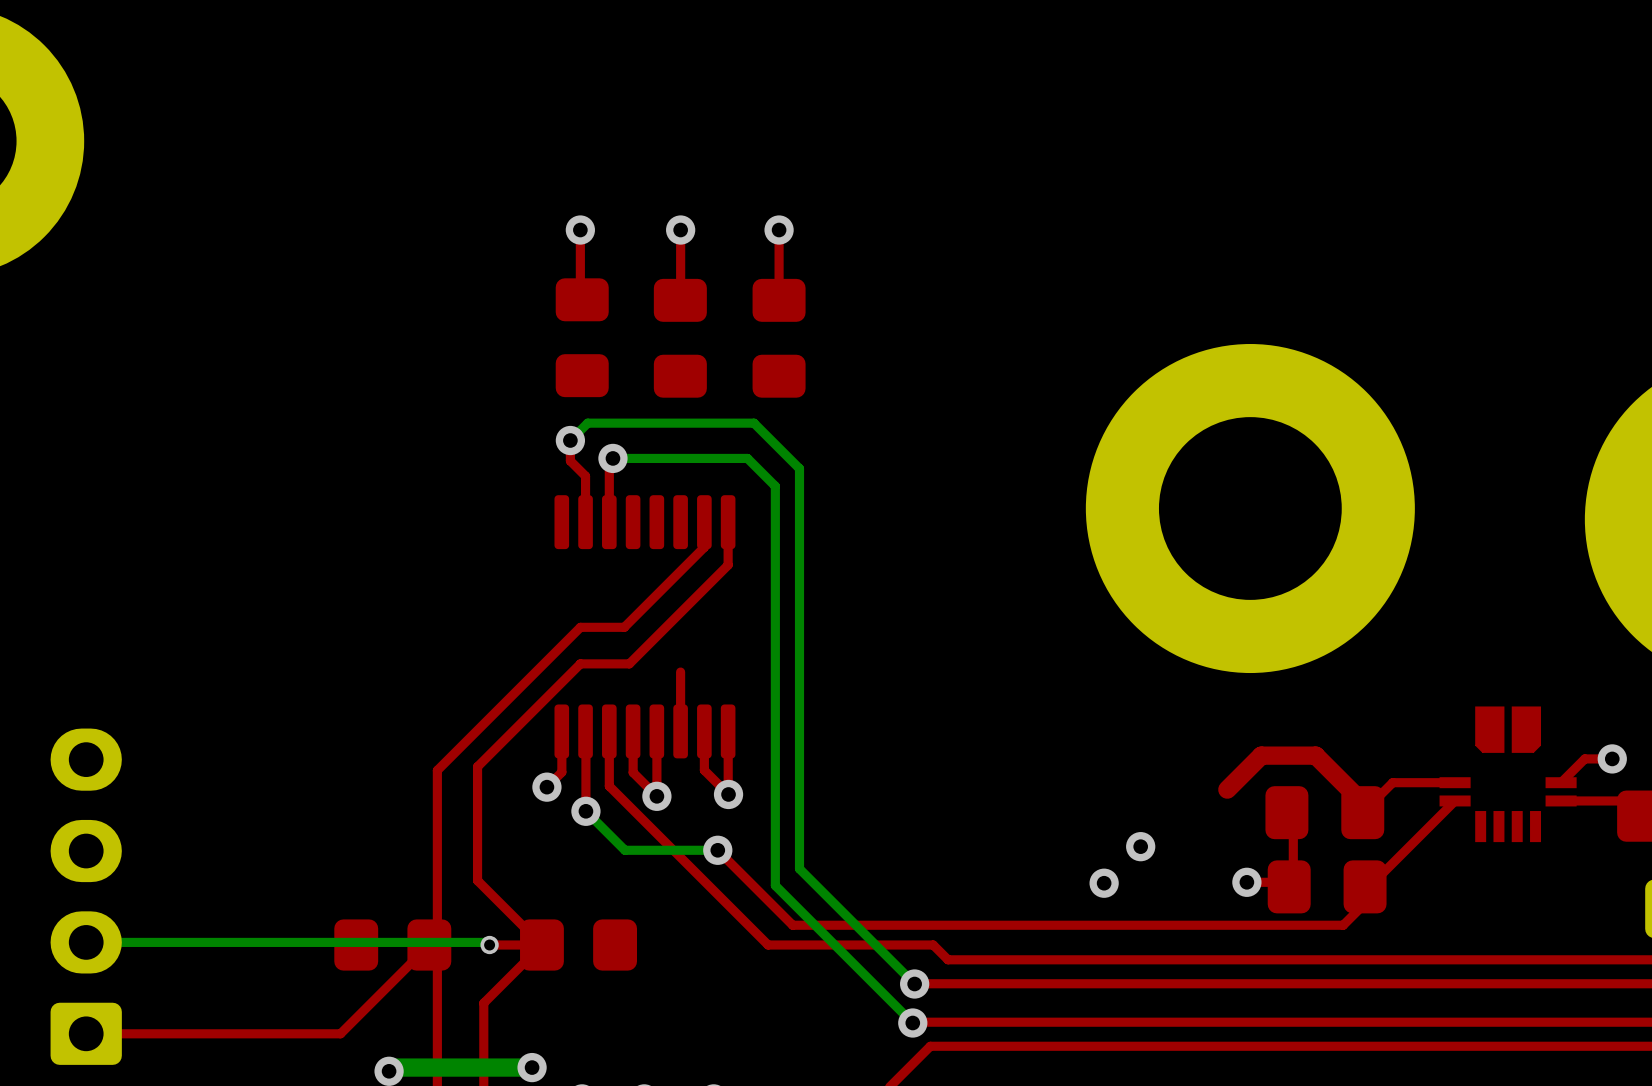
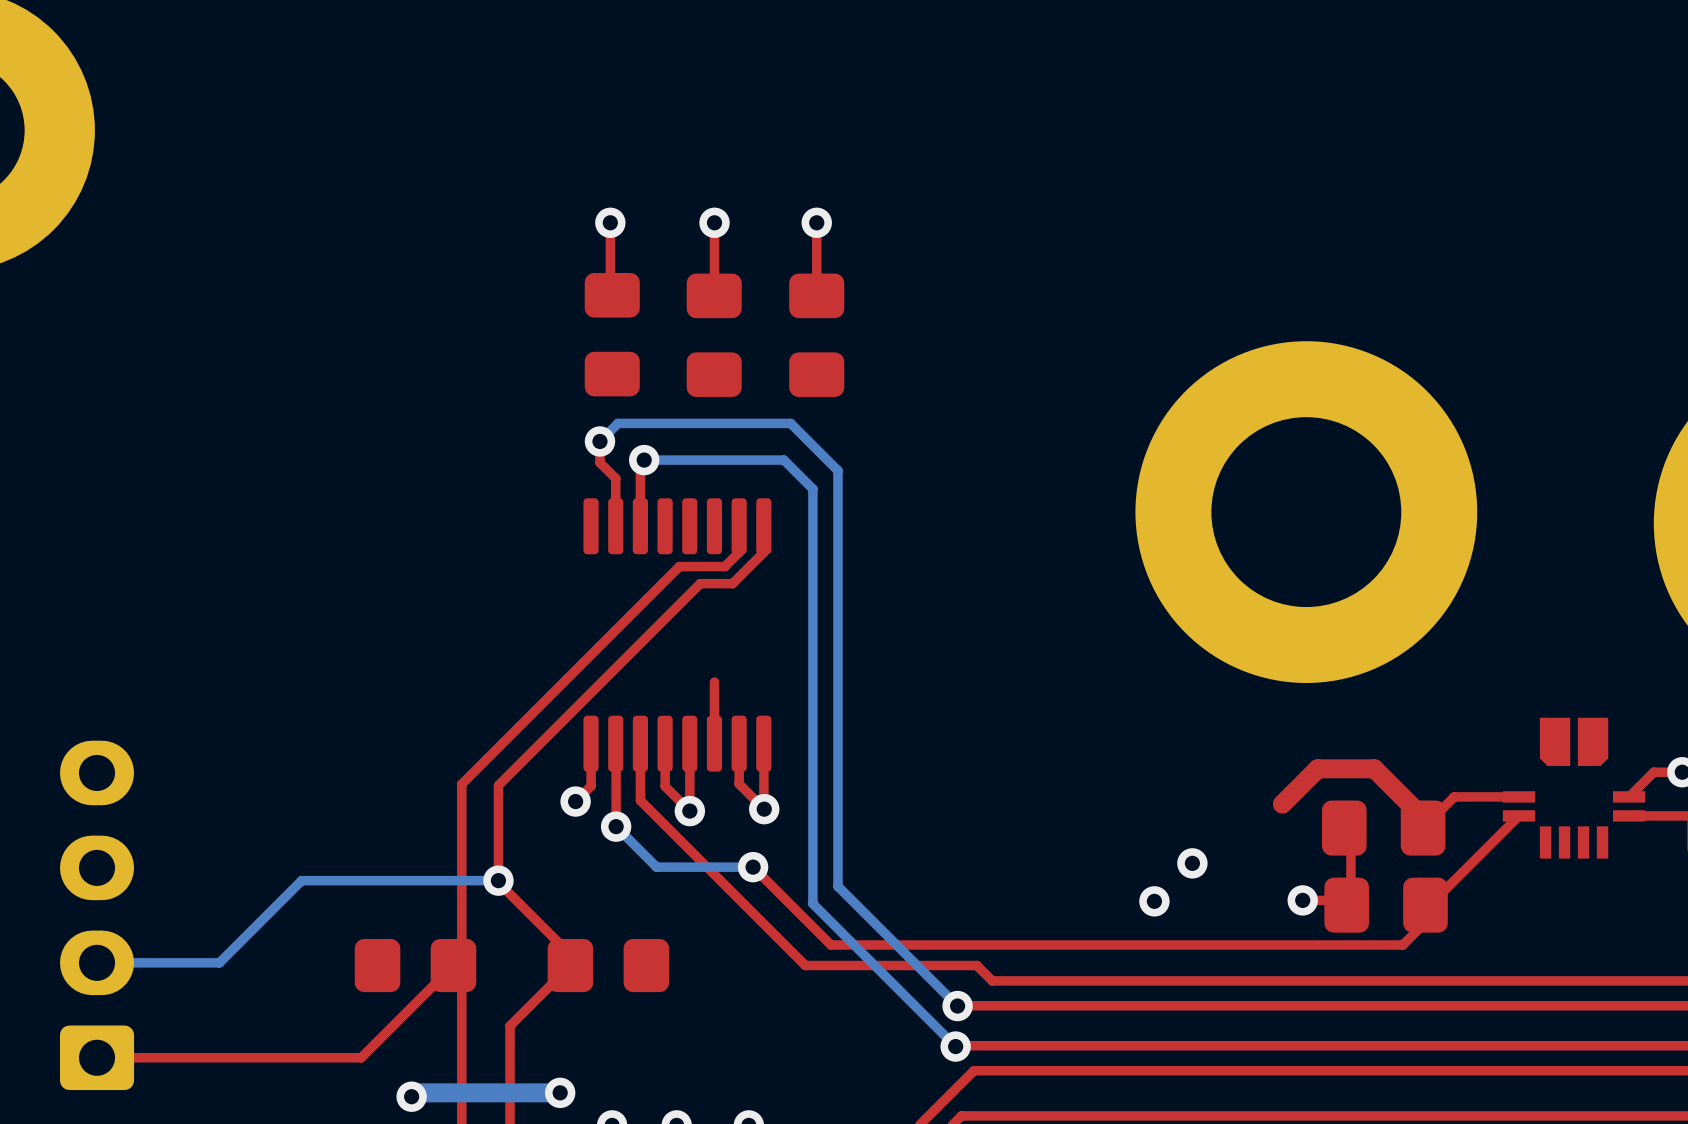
top track: (728, 547) (728, 565) (629, 663) (580, 663) -> (763, 552) (732, 583) (700, 583) (610, 673)
top track: (690, 560) (624, 627) (580, 627) -> (724, 566) (679, 566) (610, 635)
top track: (477, 766) (477, 880) (541, 945) (489, 945) -> (503, 780) (498, 785) (498, 882) (567, 952)
via: none -> (498, 880)
bottom track: (204, 942) (487, 942) (489, 945) -> (219, 962) (301, 880) (498, 880)
via: (489, 945) -> none

